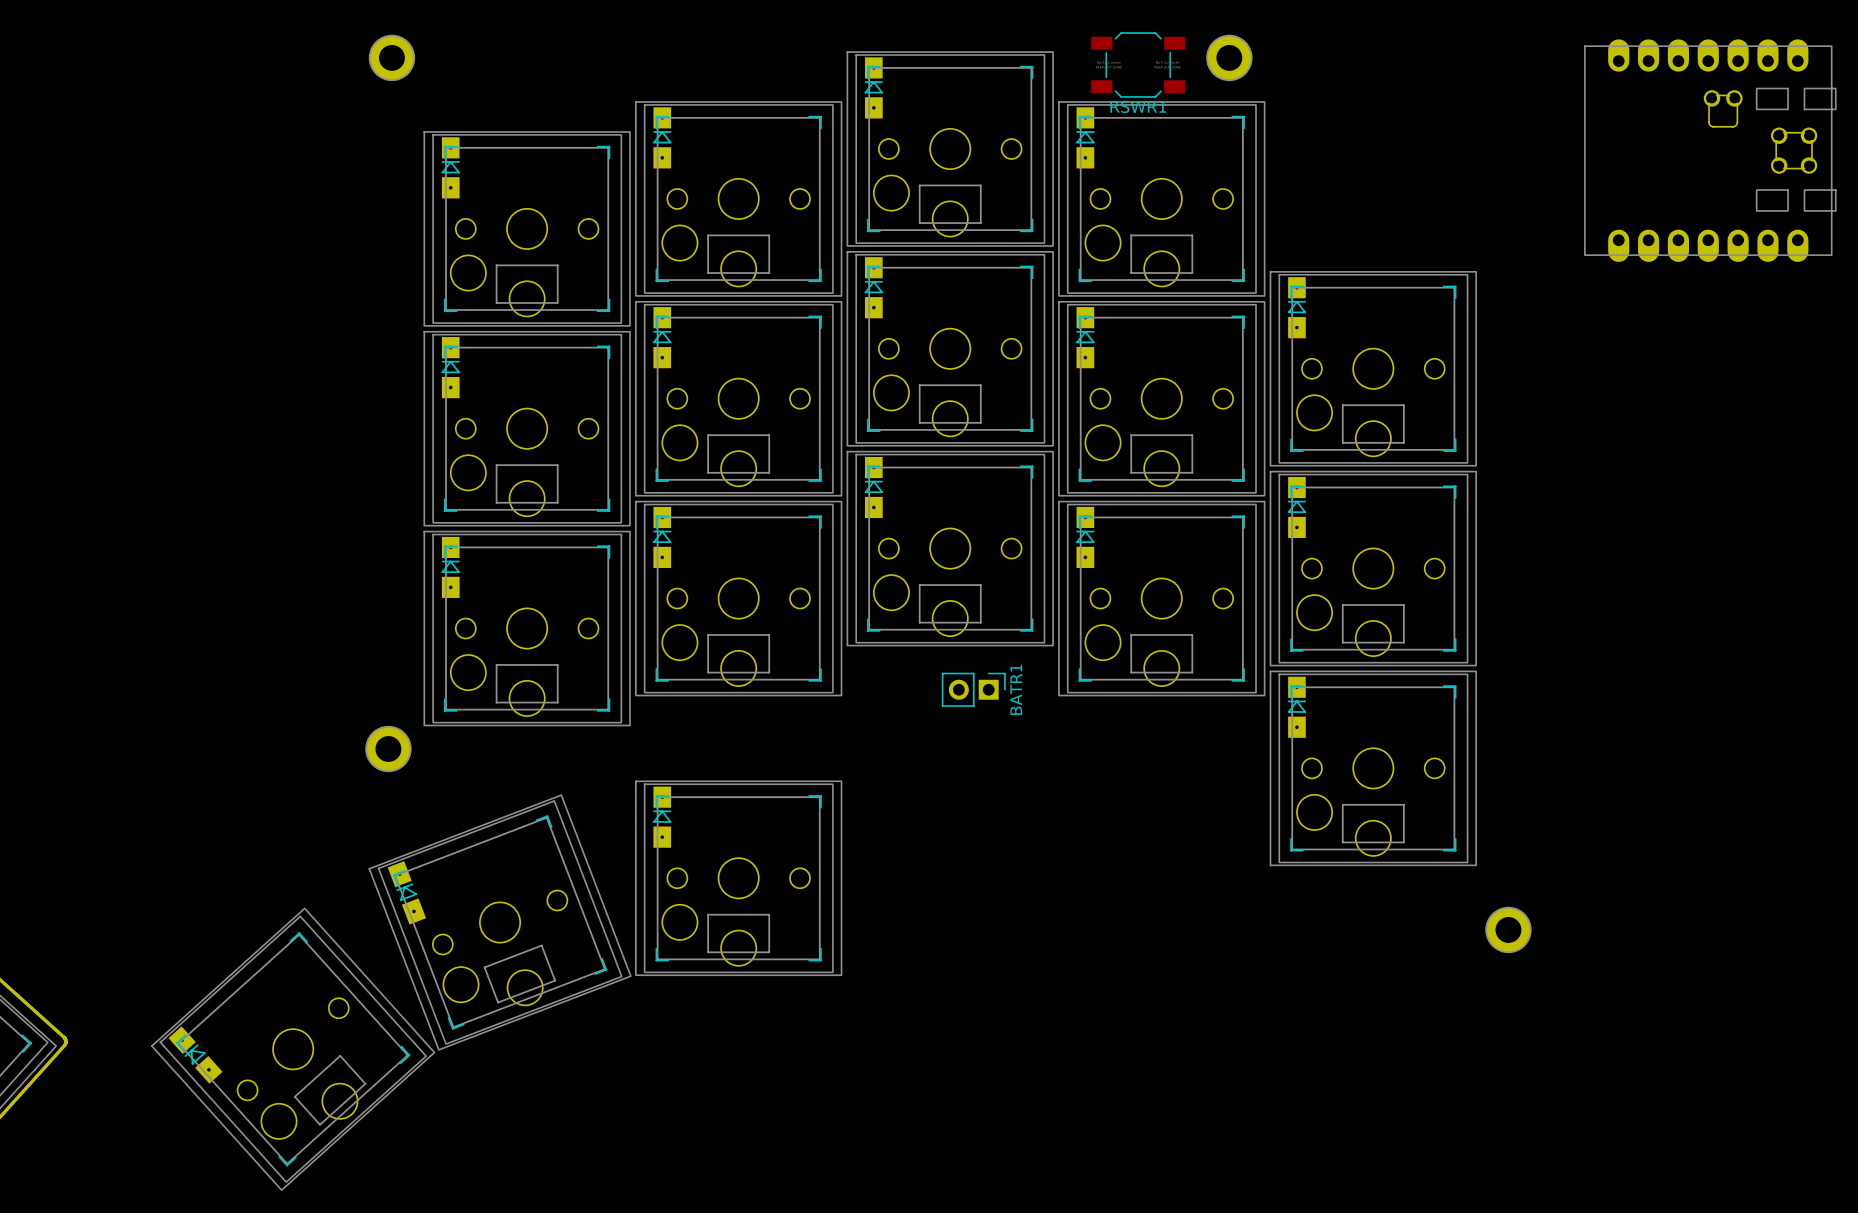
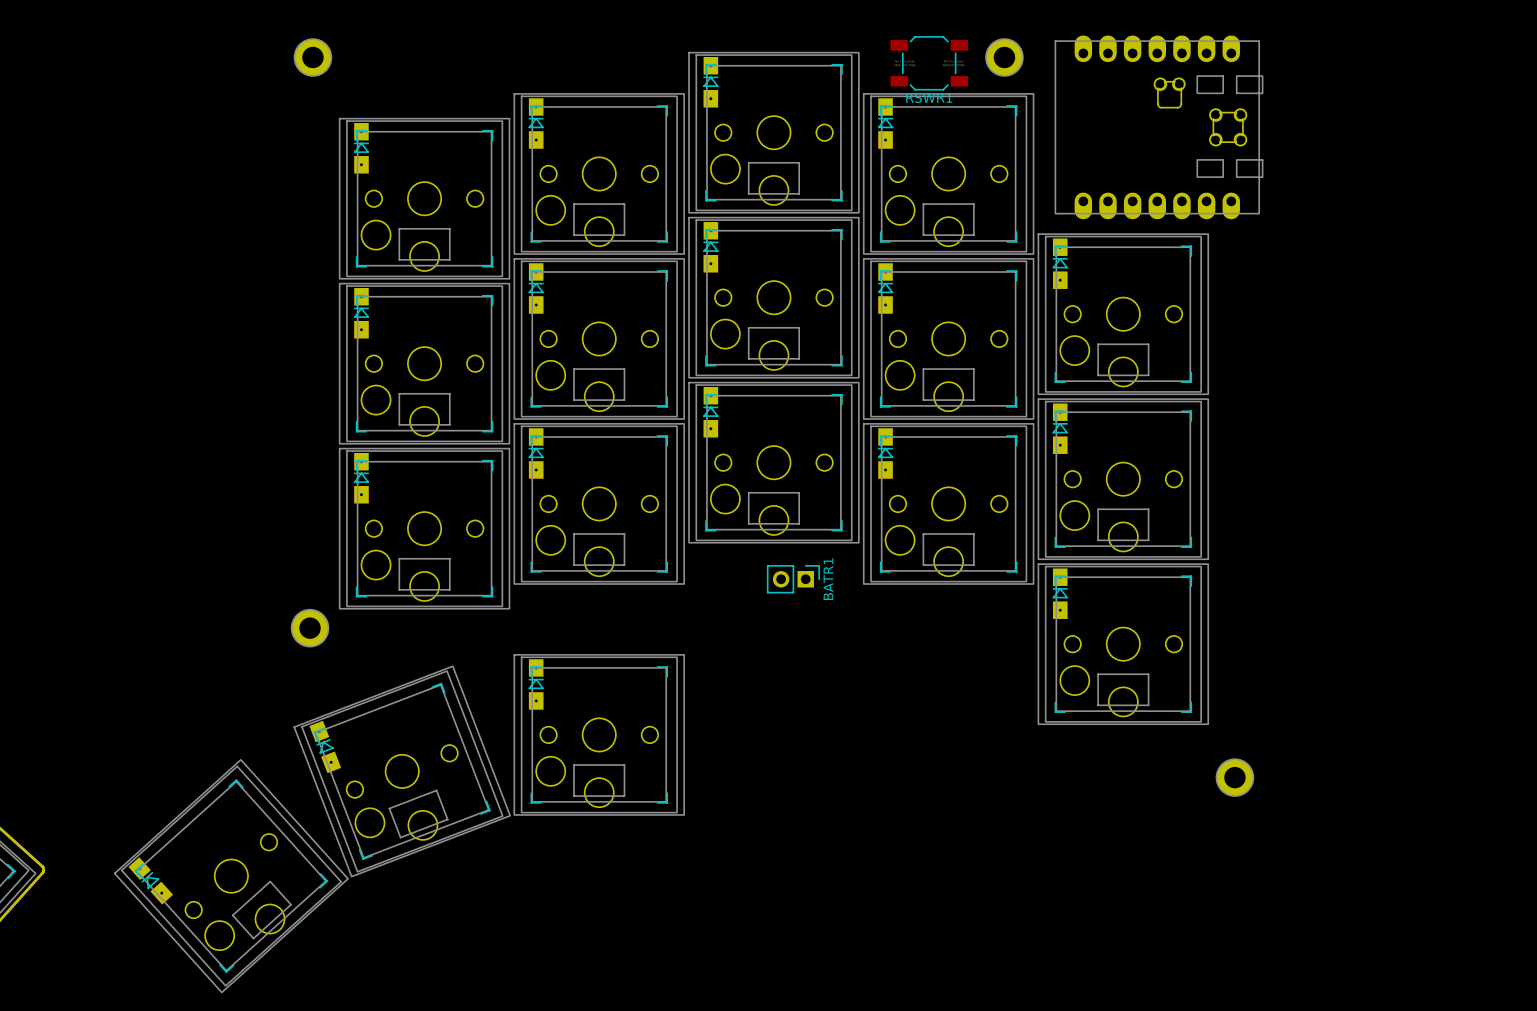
part: none -> (1158, 127)
part: (1710, 150) -> none

